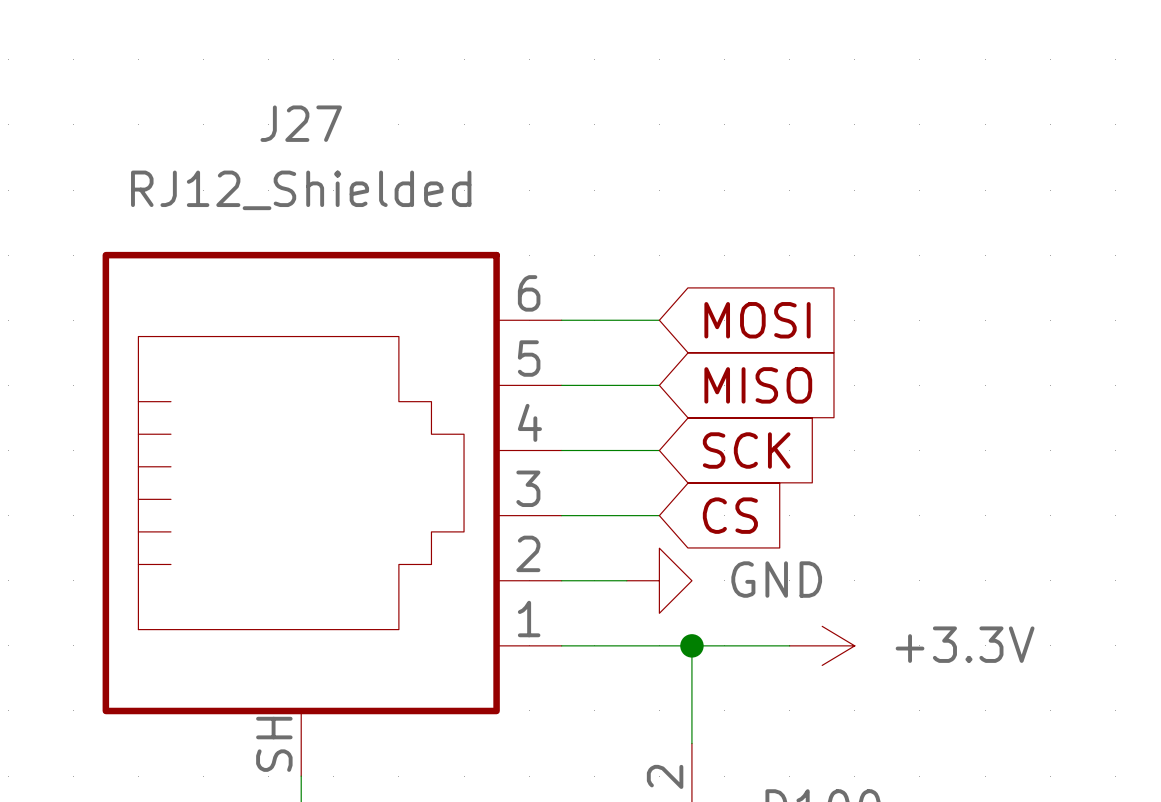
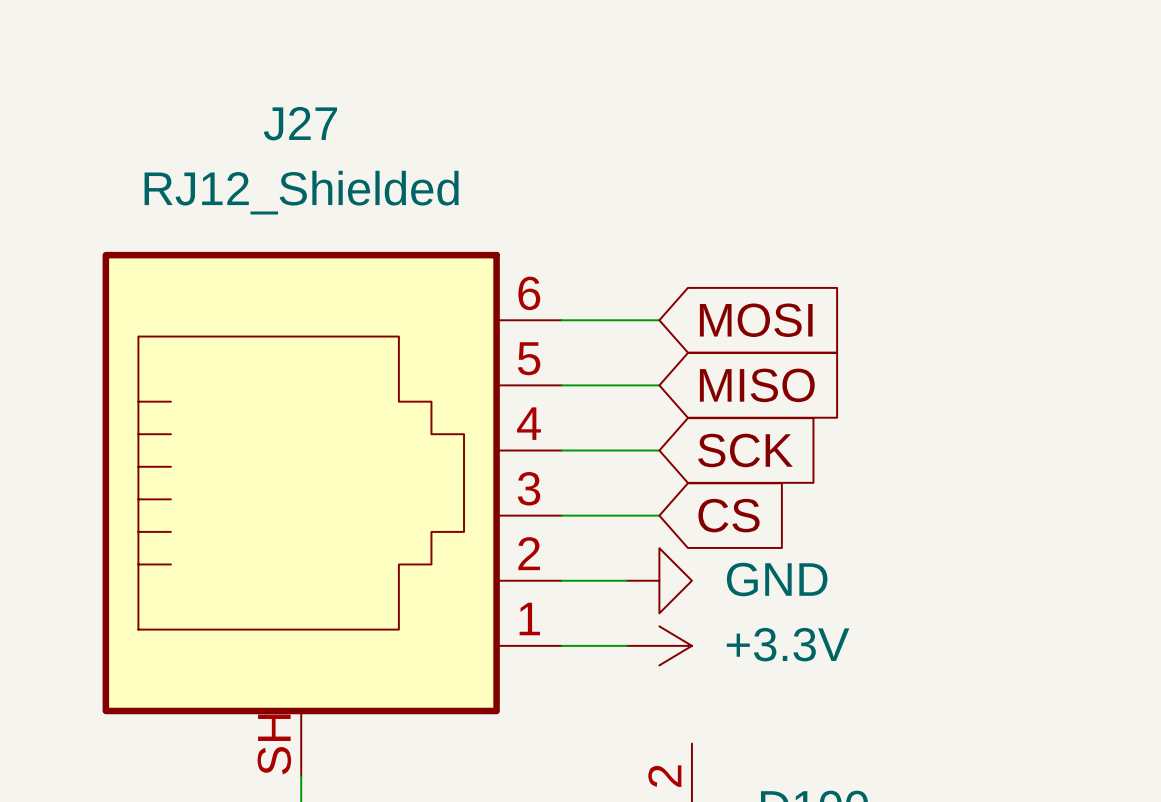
wire: (626, 645) (789, 645) -> none
wire: (691, 645) (691, 743) -> none
junction: (691, 645) -> none
power symbol position: +3.3V (822, 645) -> +3.3V (659, 645)

